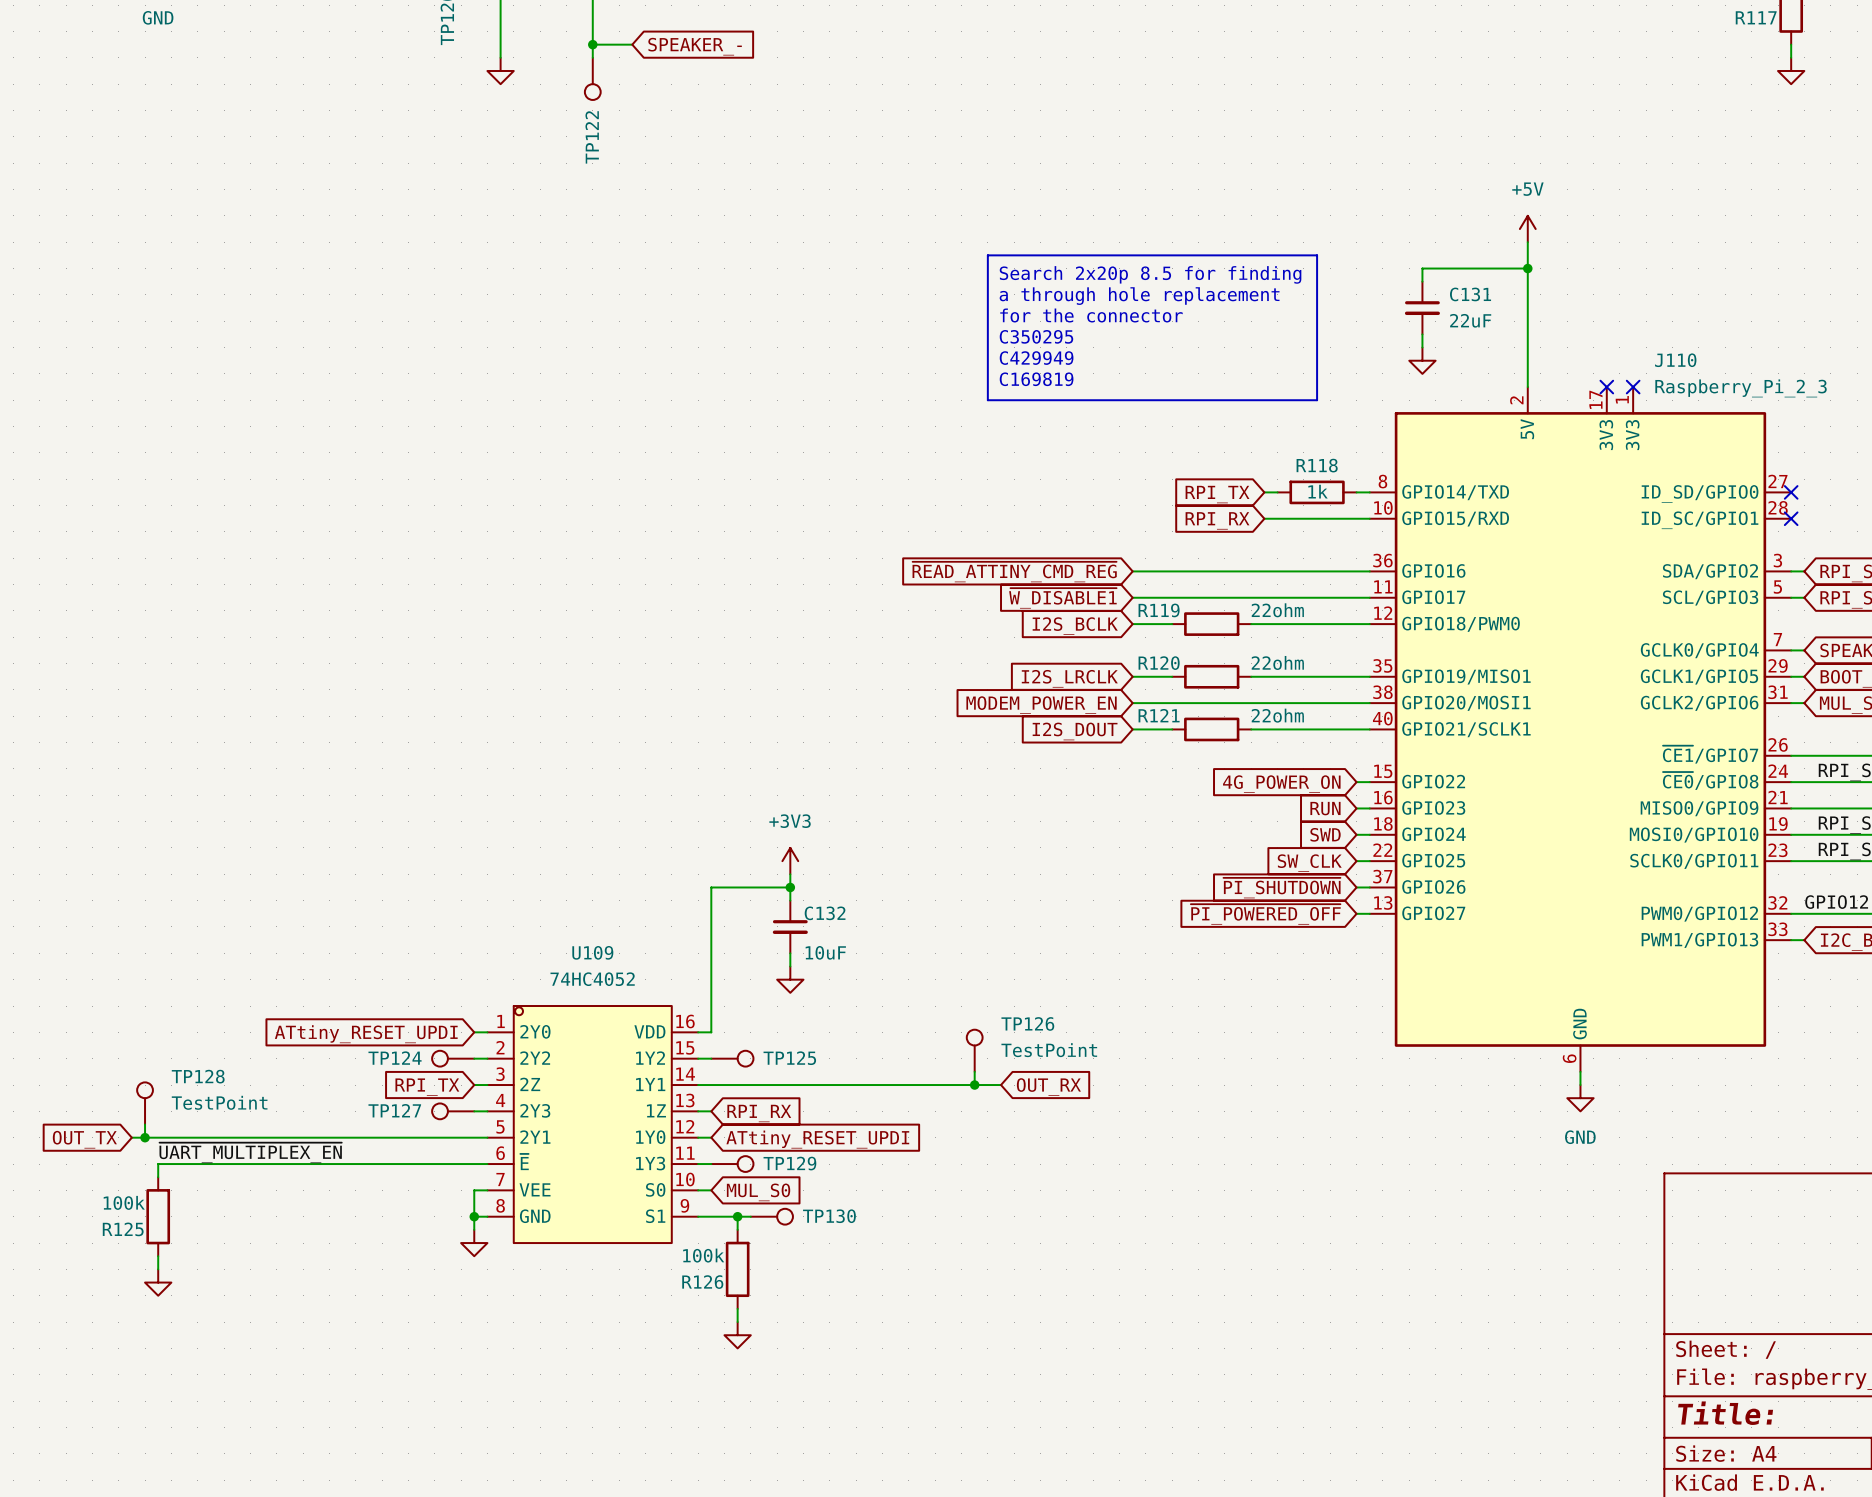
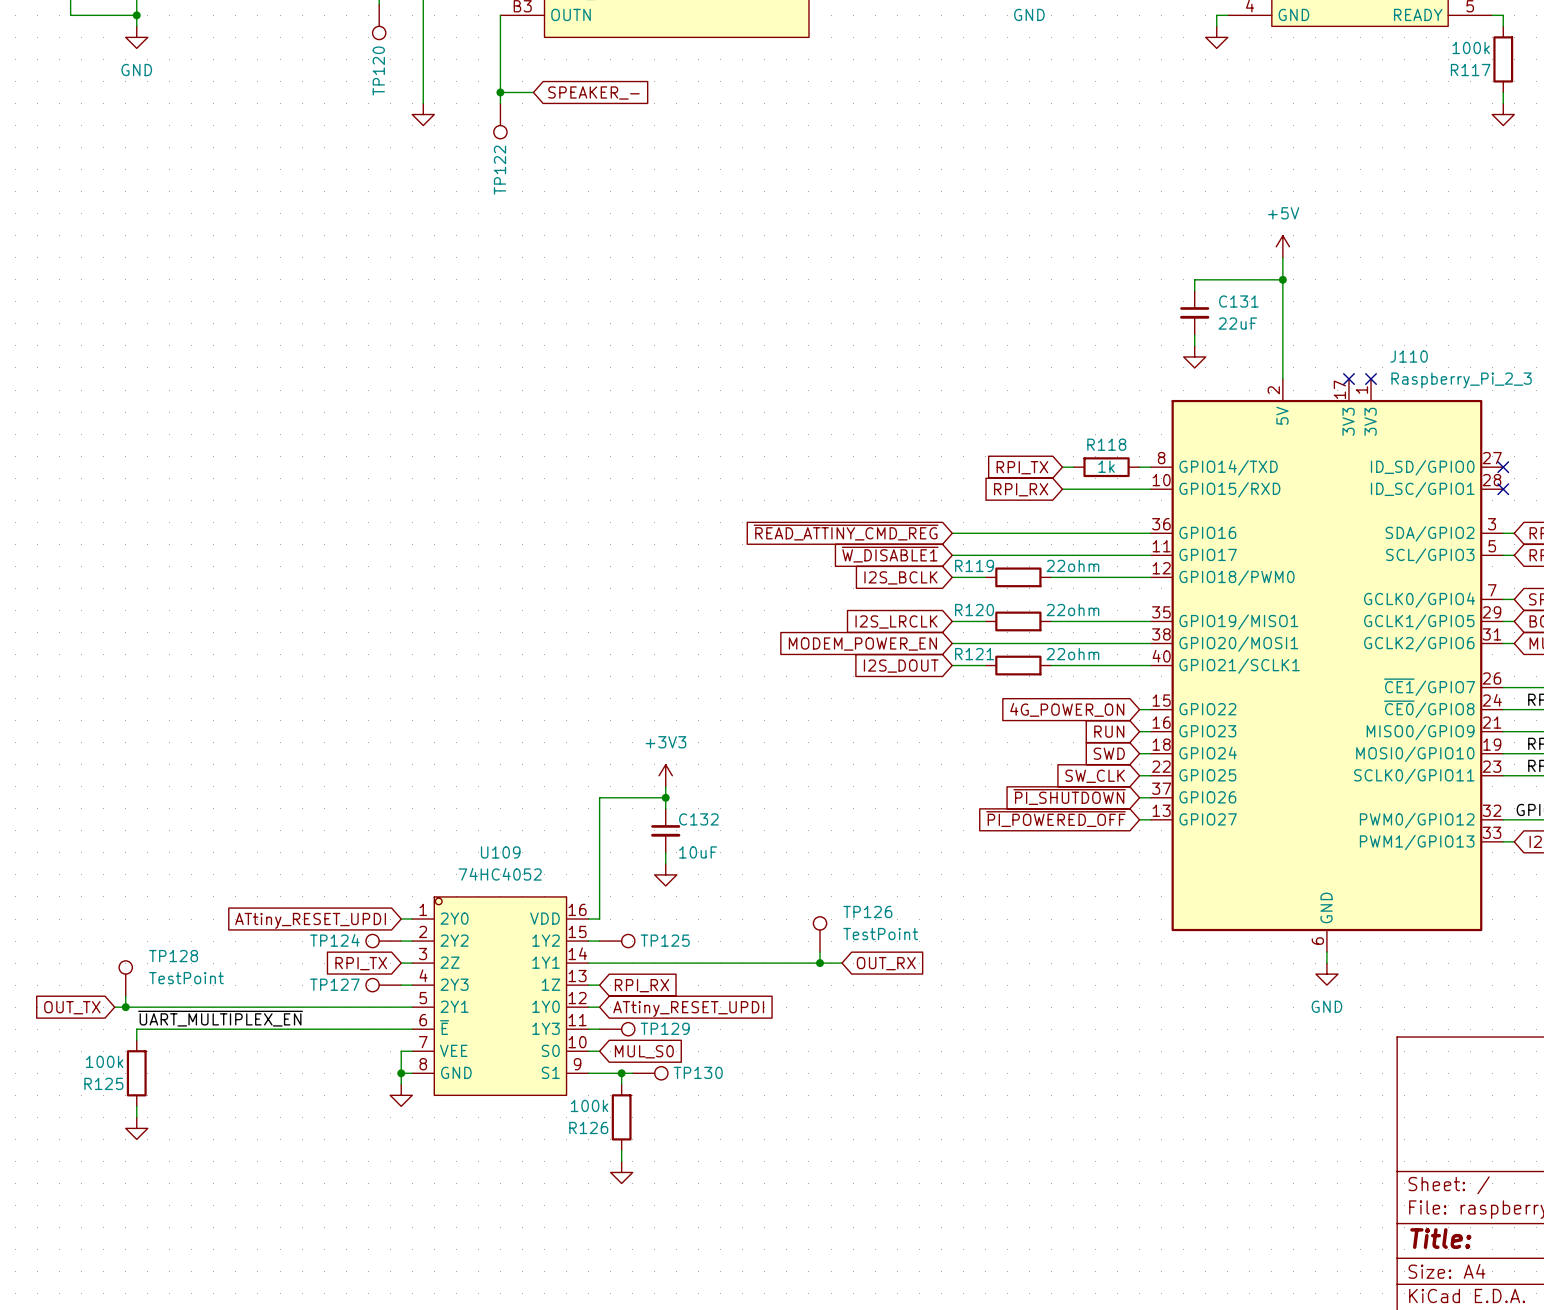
line: (987, 255) (1317, 255) (1317, 400) (987, 400) (987, 255) -> none
text: Search 2x20p 8.5 for finding (1150, 274) -> none
text: a through hole replacement (1139, 296) -> none
text: for the connector (1091, 315) -> none
text: C350295 (1036, 336) -> none
text: C429949 (1036, 358) -> none
text: C169819 (1036, 379) -> none

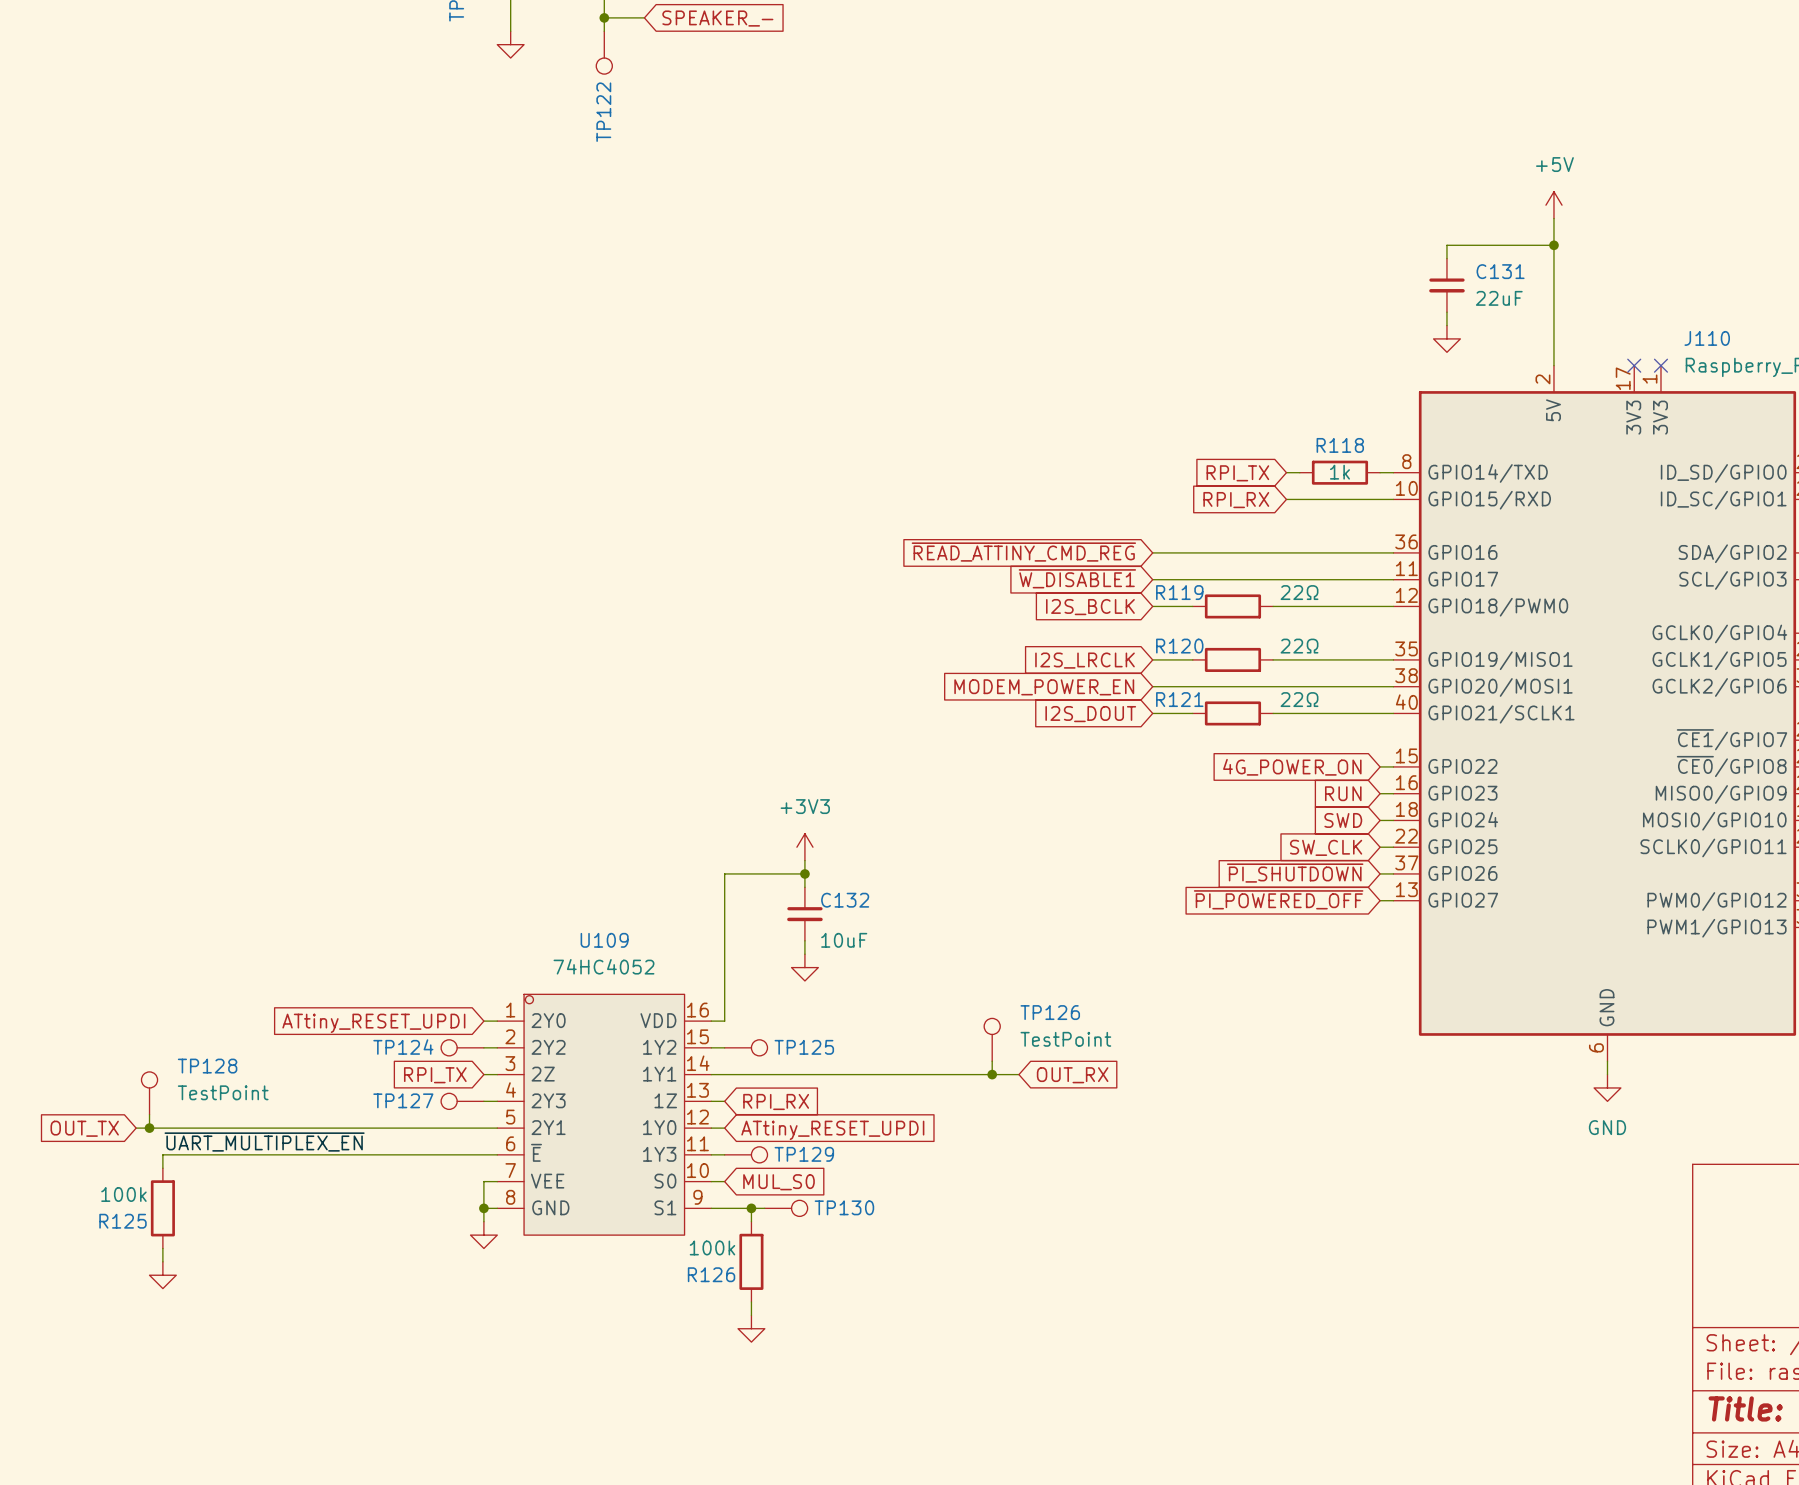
R119 value: 22ohm (1072, 565) -> 22Ω (1299, 592)
R120 value: 22ohm (1072, 610) -> 22Ω (1299, 646)
R121 value: 22ohm (1072, 654) -> 22Ω (1299, 699)

